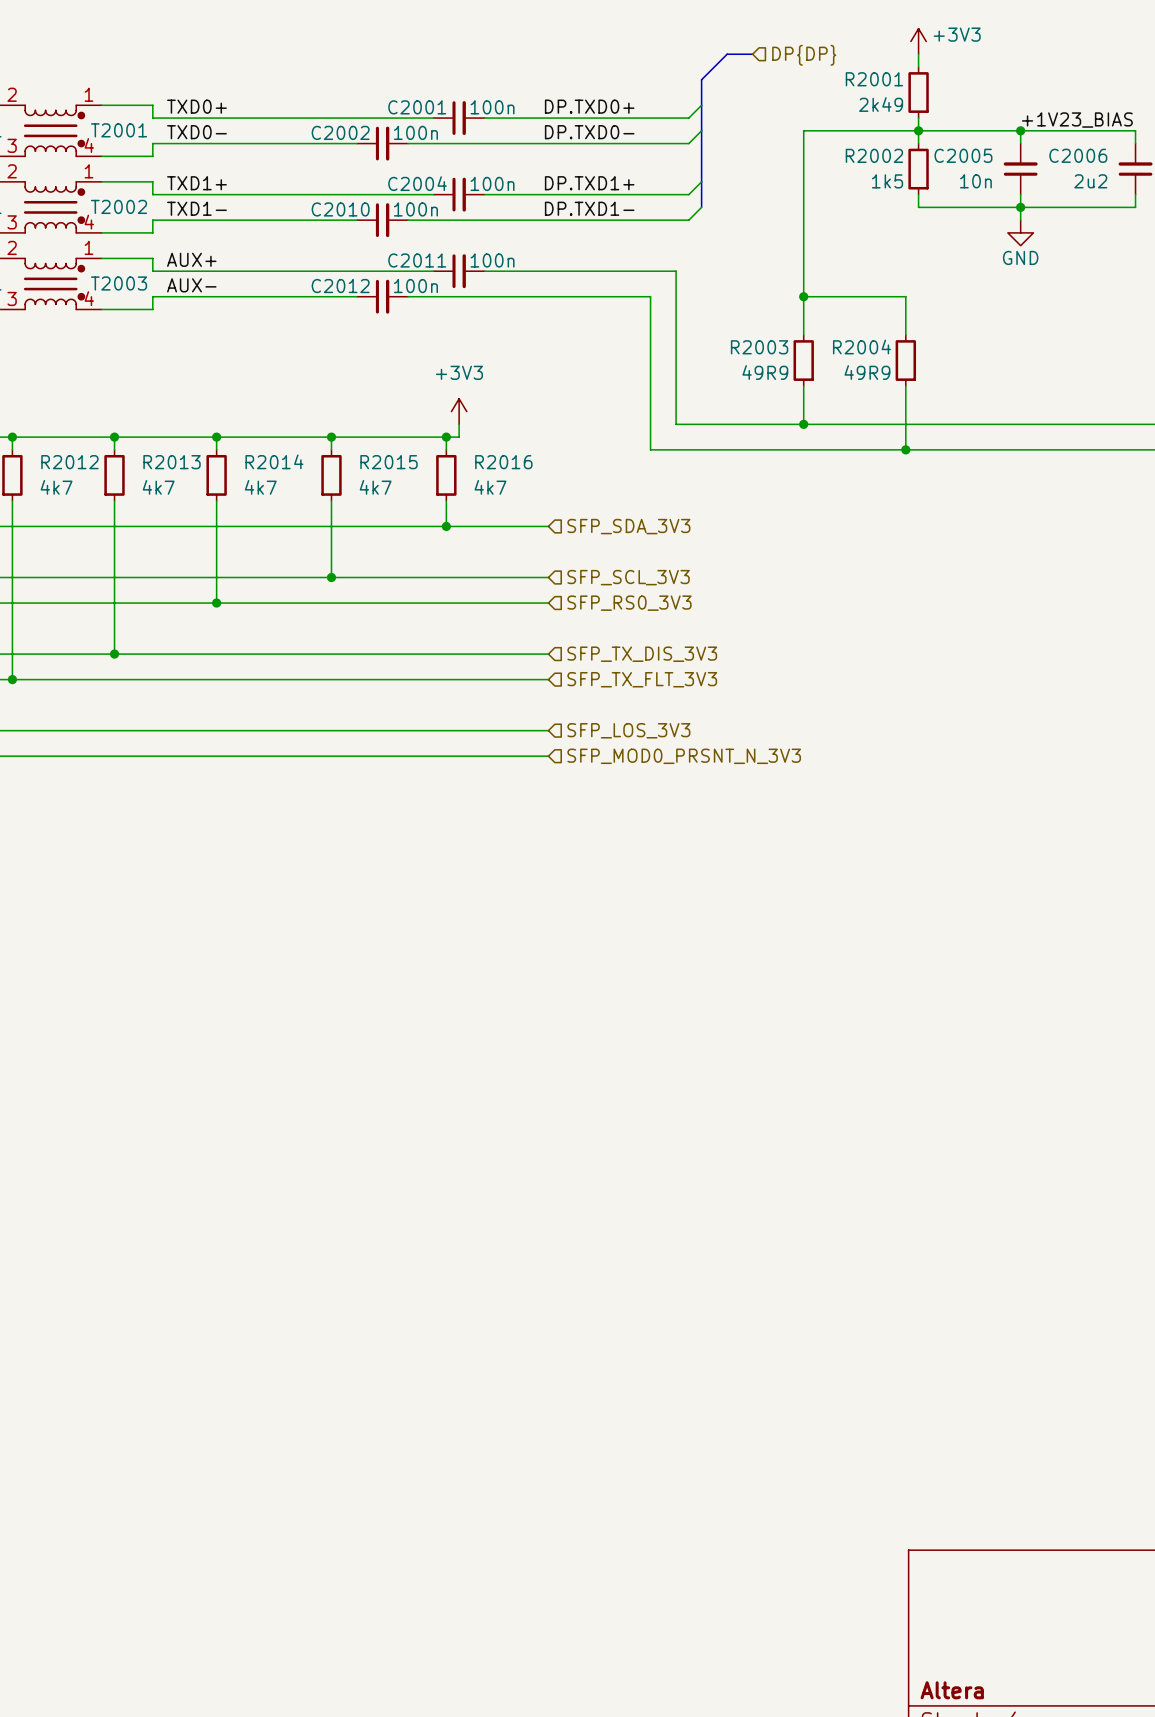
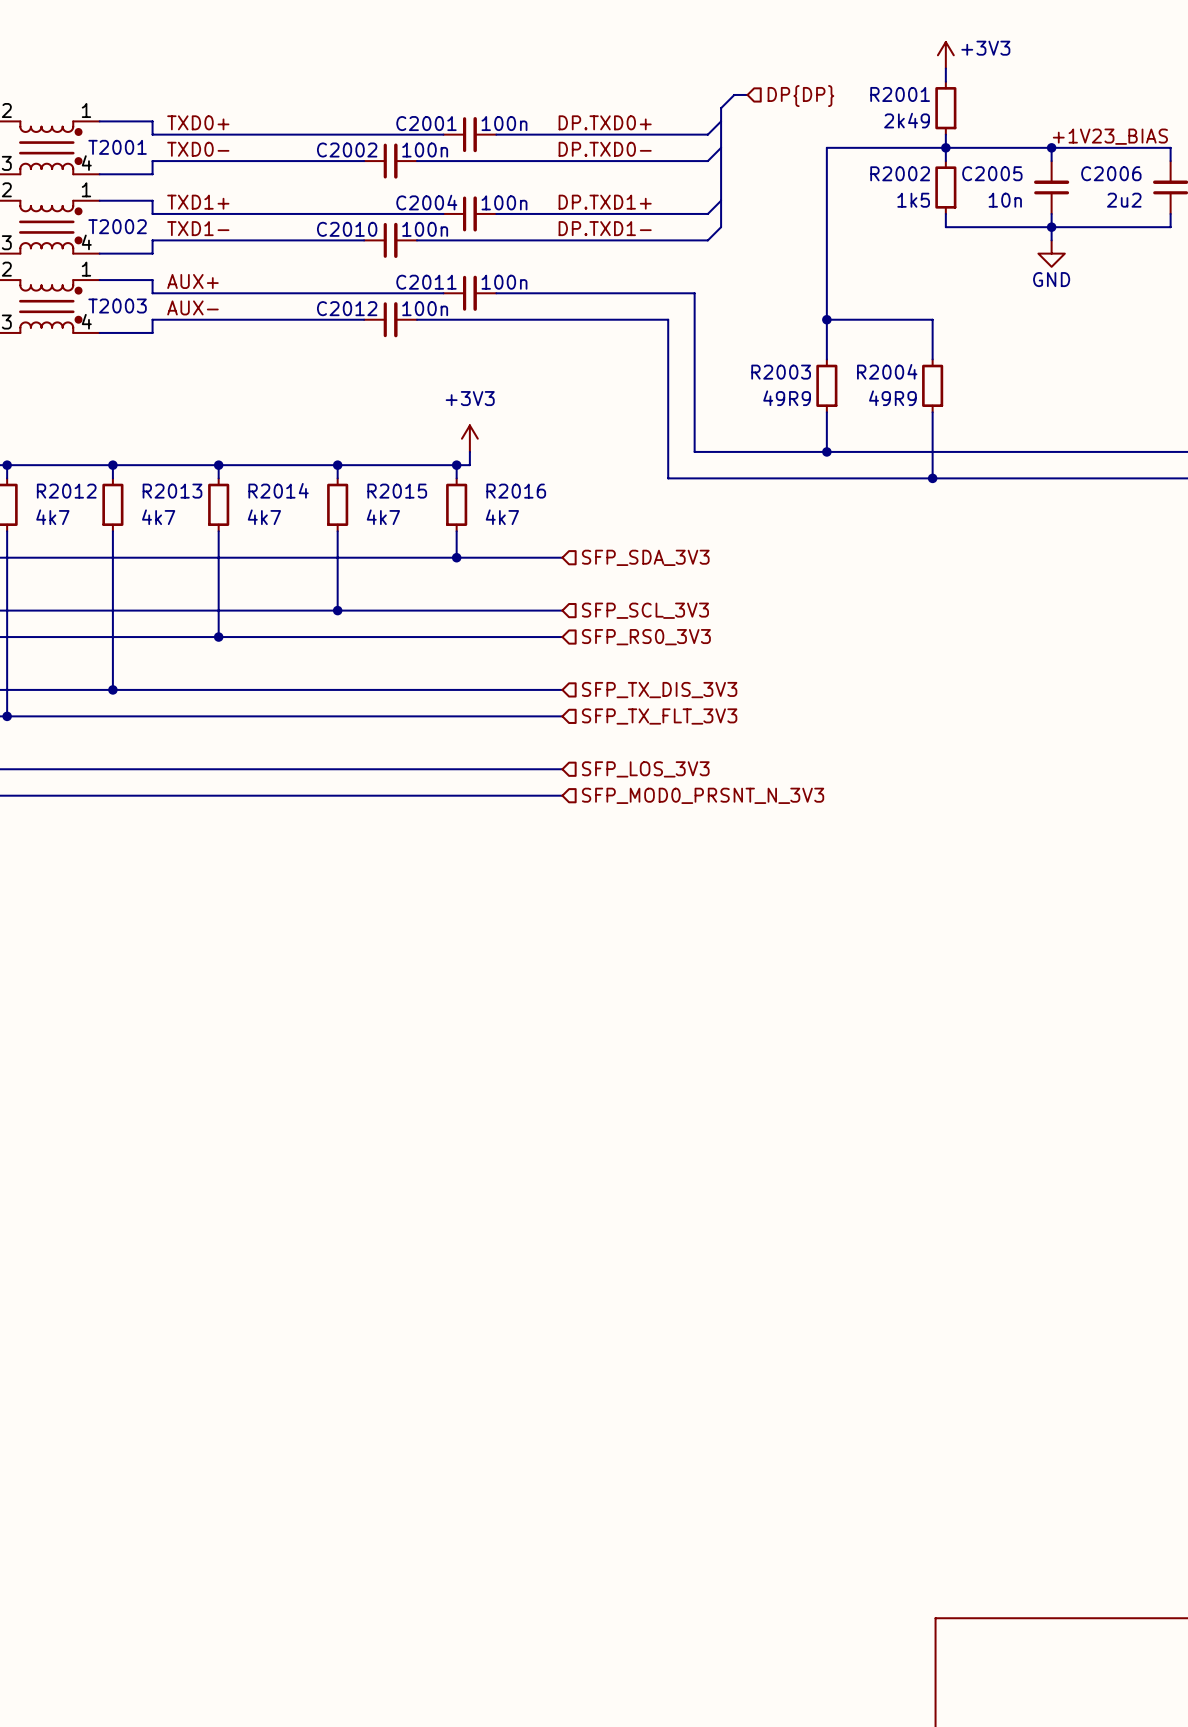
bus: (752, 54) (727, 54) (701, 79) (701, 92) -> (747, 94) (734, 94) (721, 108)
hierarchical label position: DP{DP} (804, 55) -> DP{DP} (800, 96)

